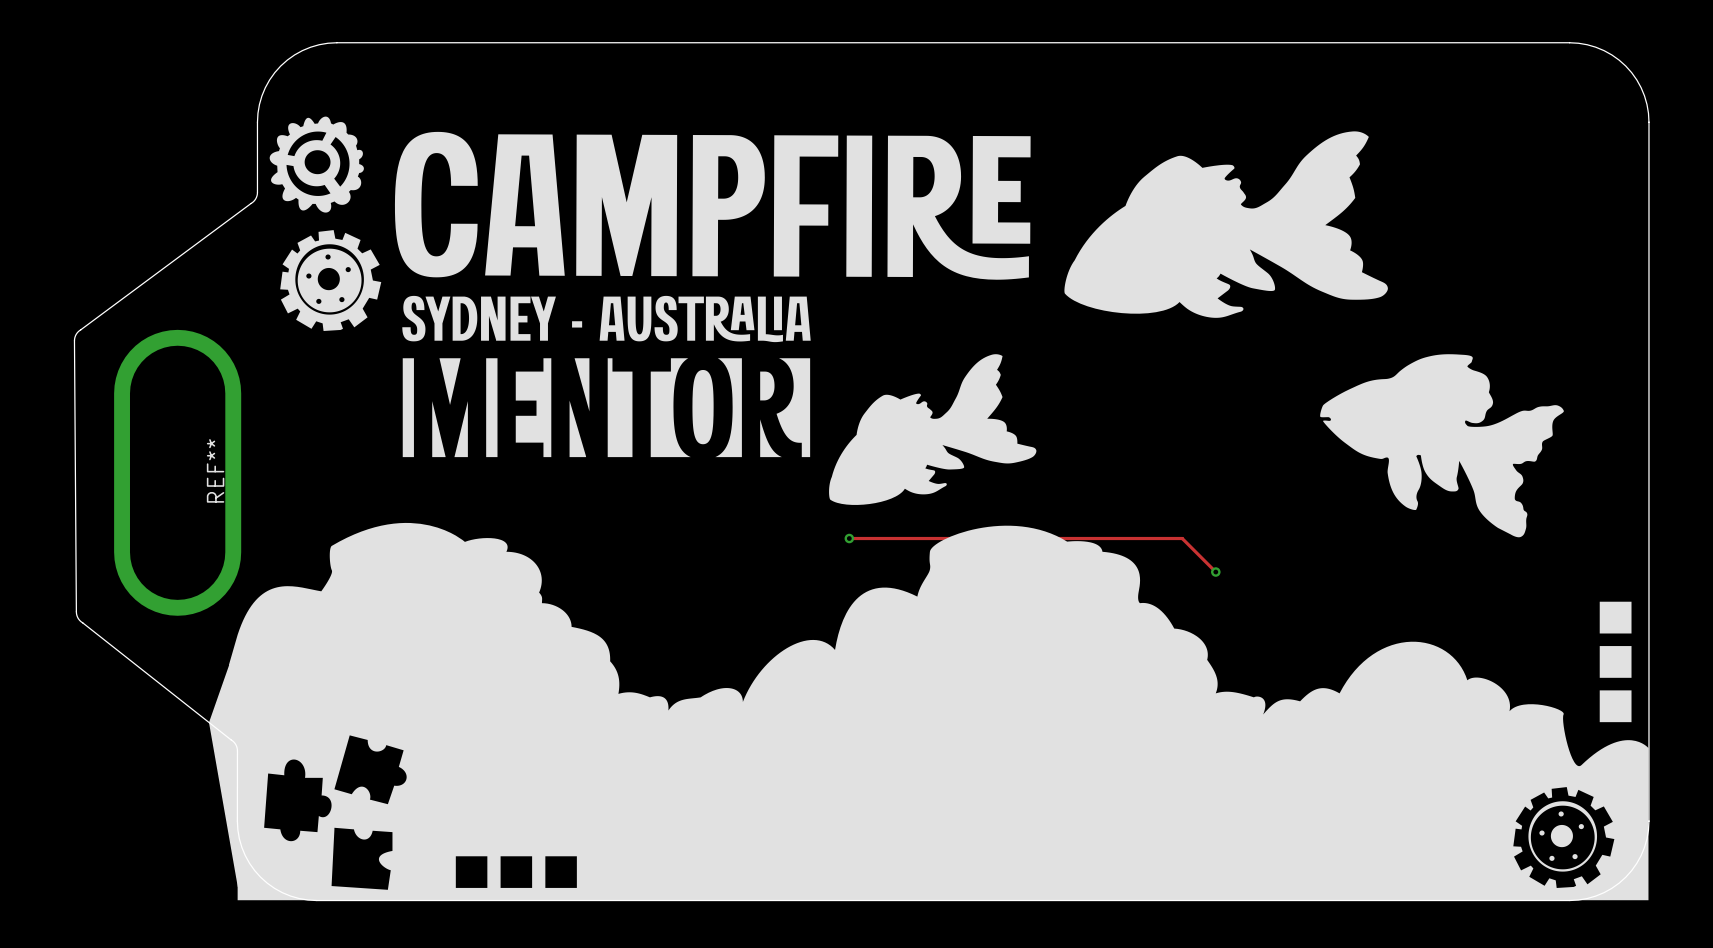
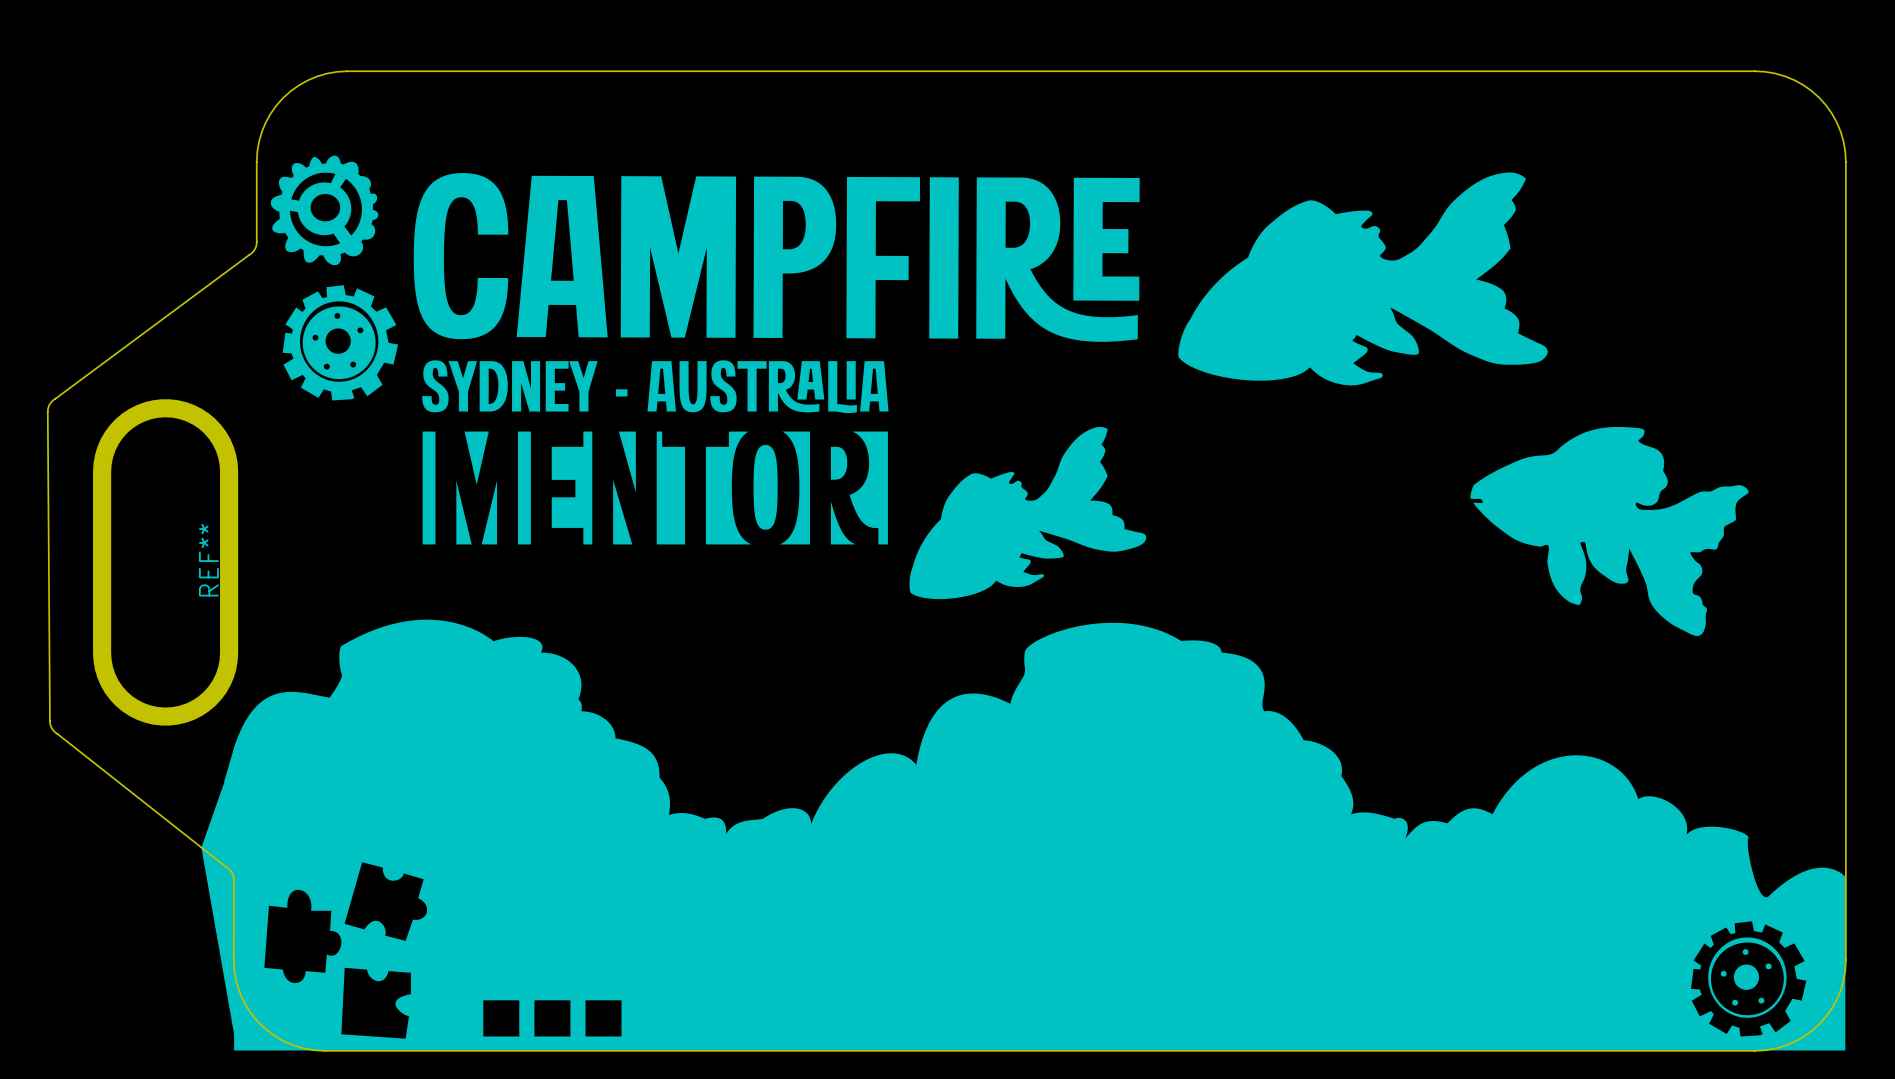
track: (849, 538) (1182, 538) (1215, 572) -> none
via: (849, 538) -> none
via: (1215, 572) -> none
drawing: [1599, 601, 1632, 723] -> none

